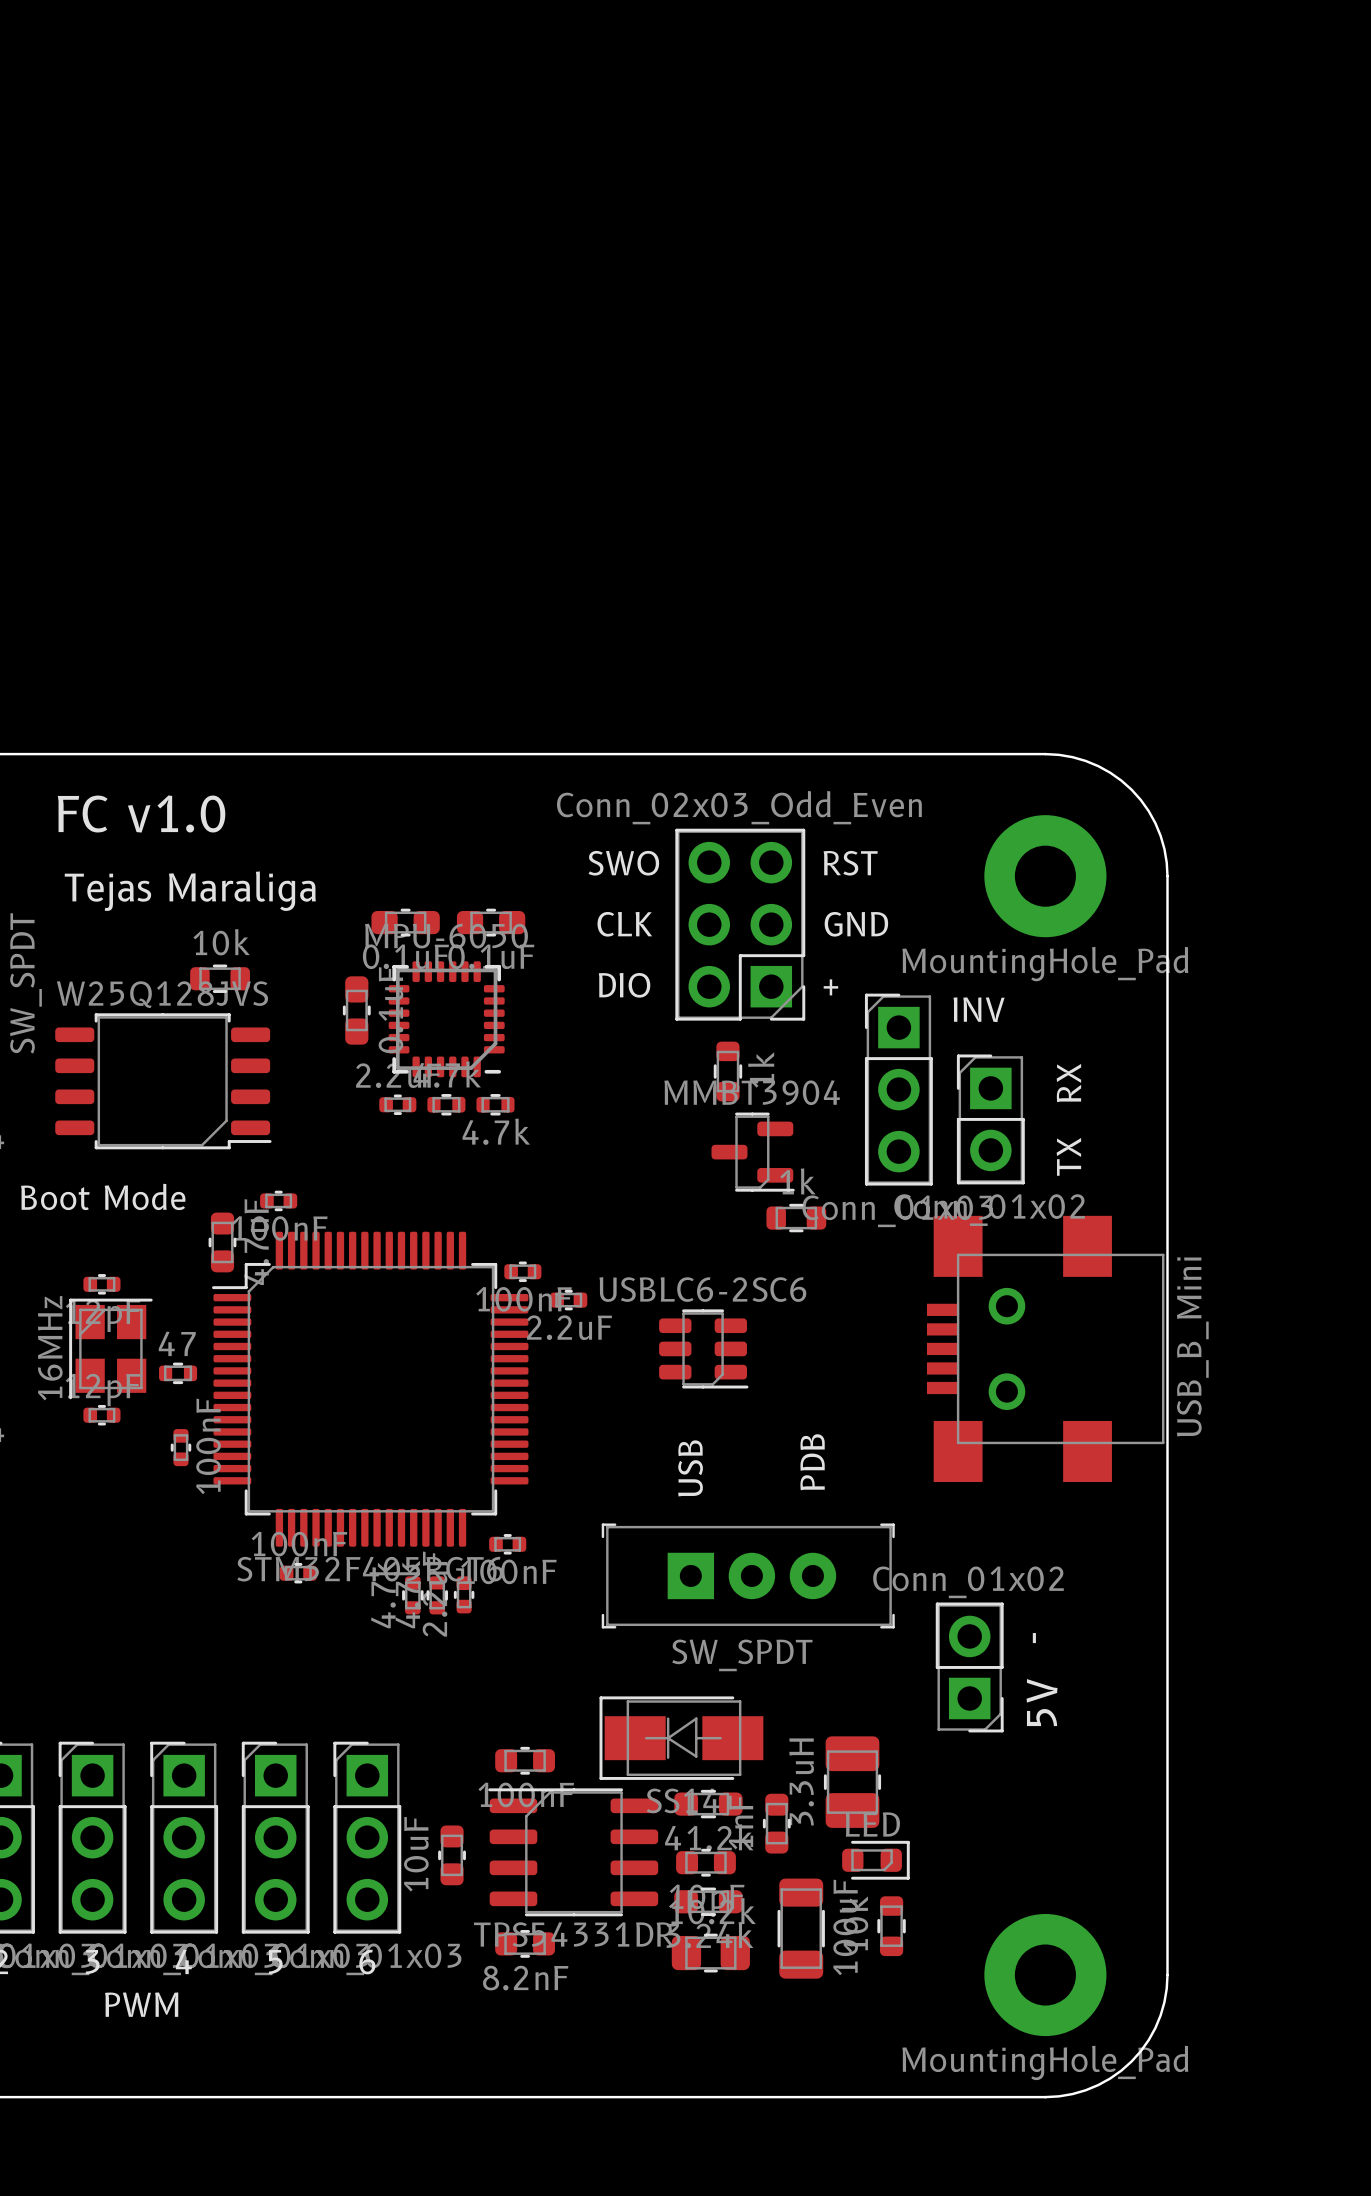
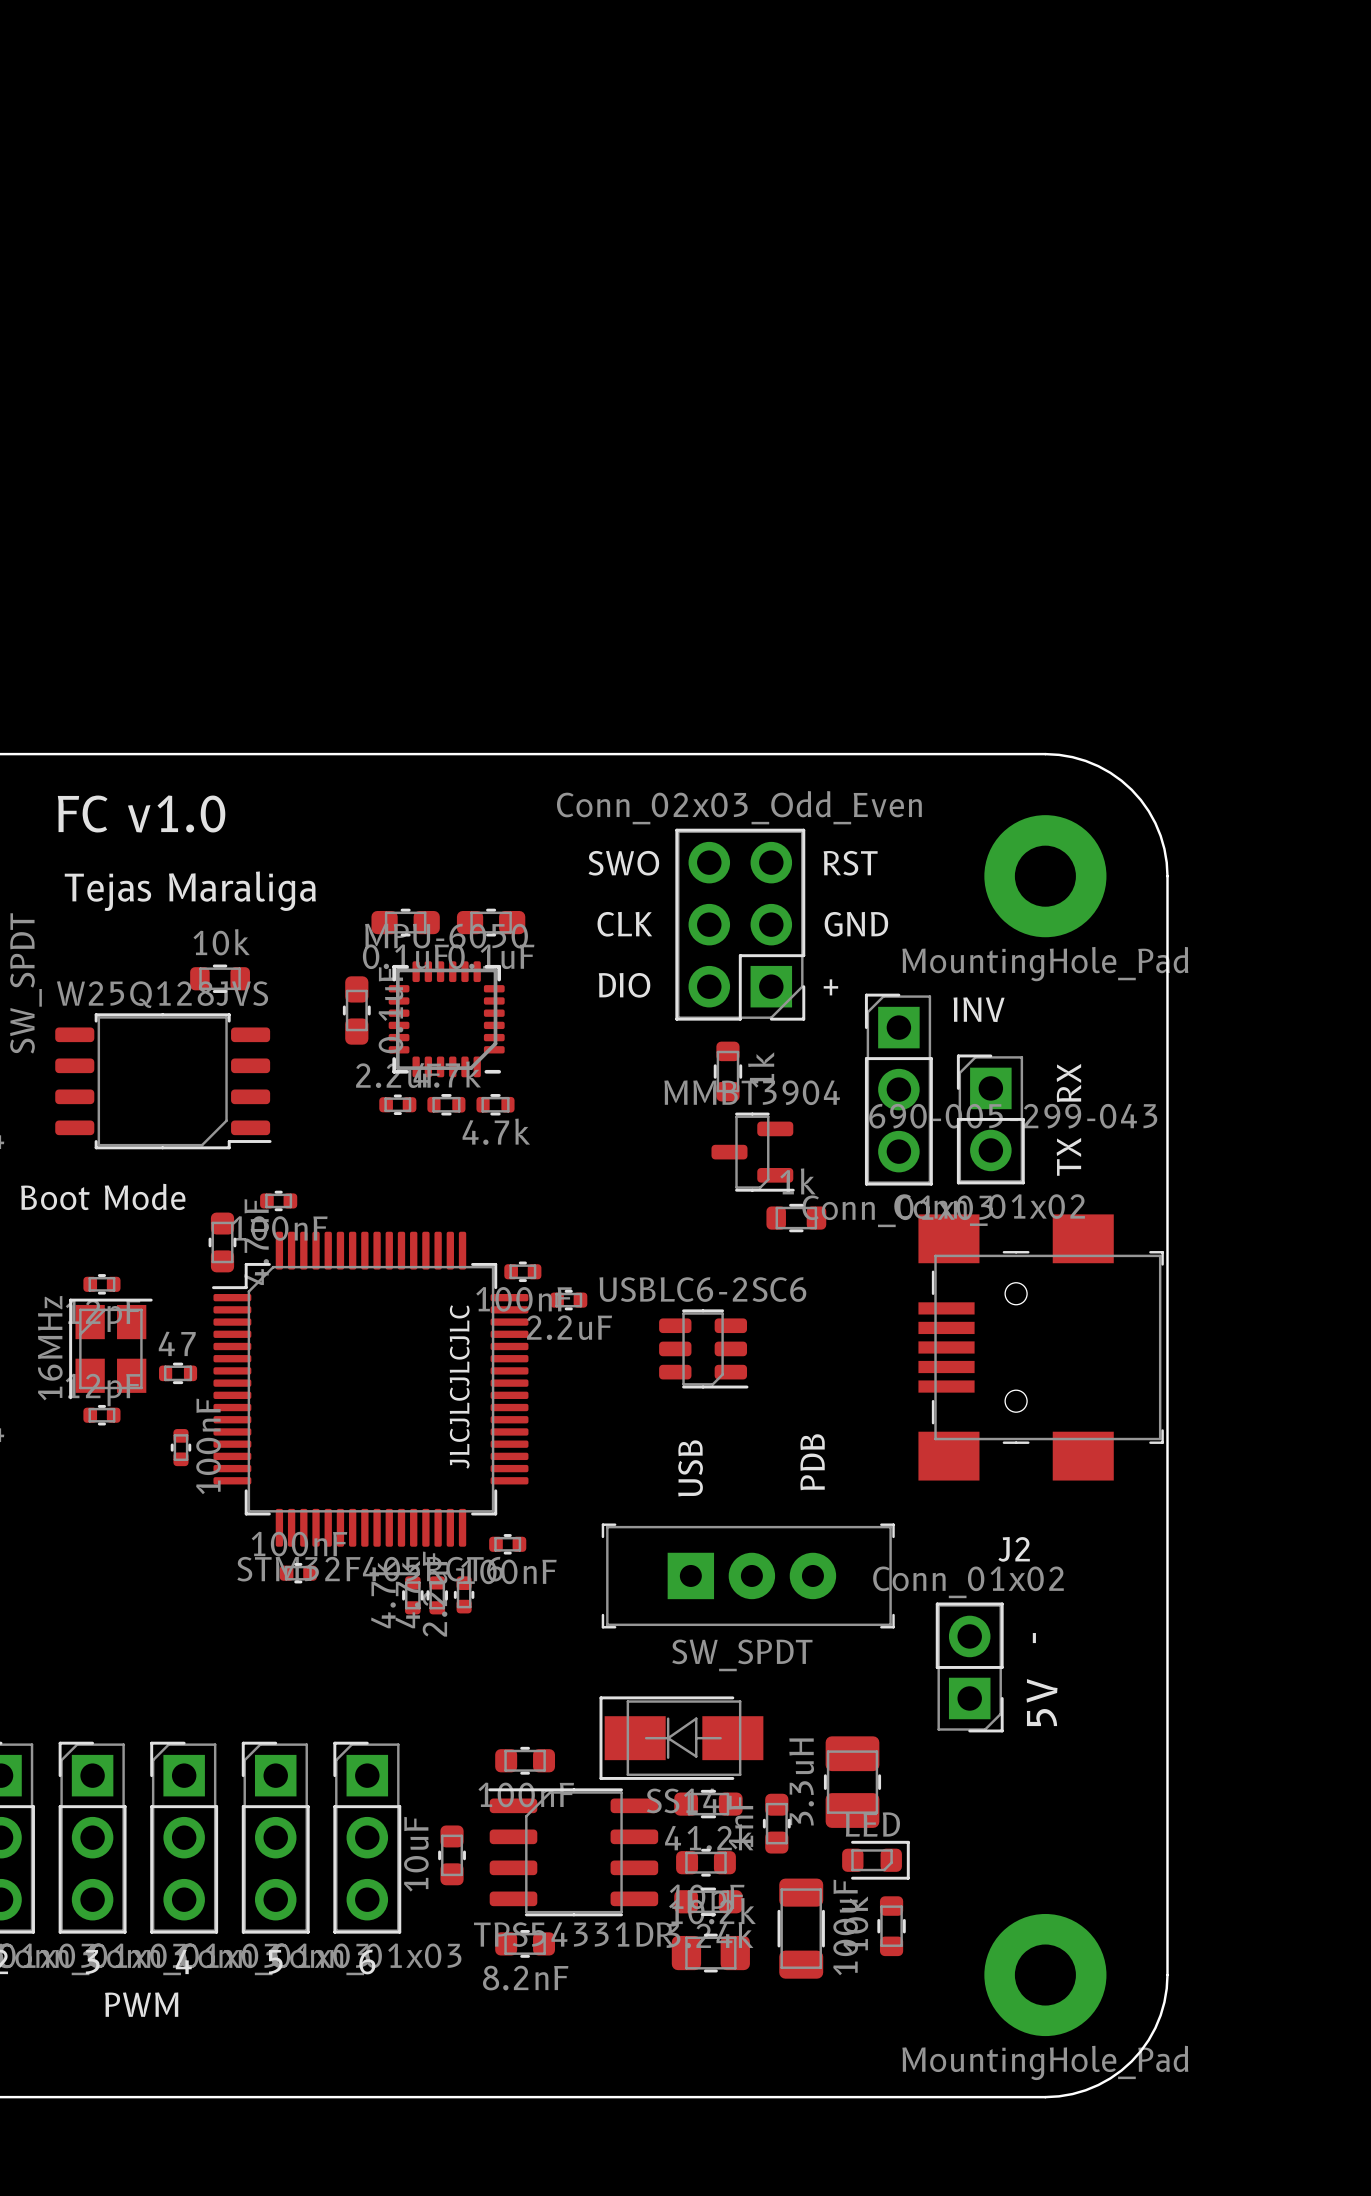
J2: none -> 690-005-299-043 (1041, 1347)
part: USB_B_Mini (1045, 1348) -> none
text: none -> JLCJLCJLCJLC (459, 1386)

